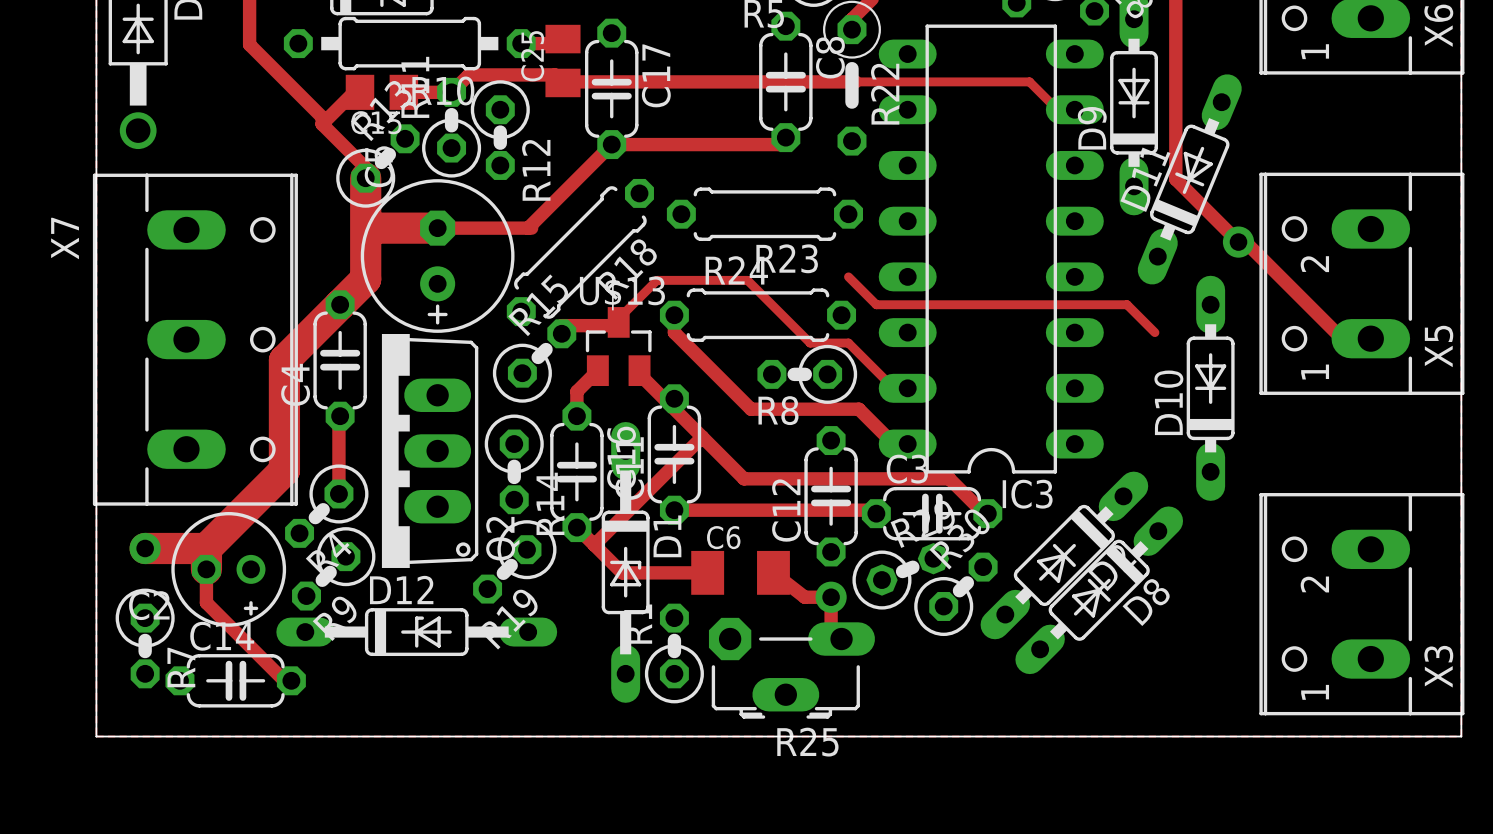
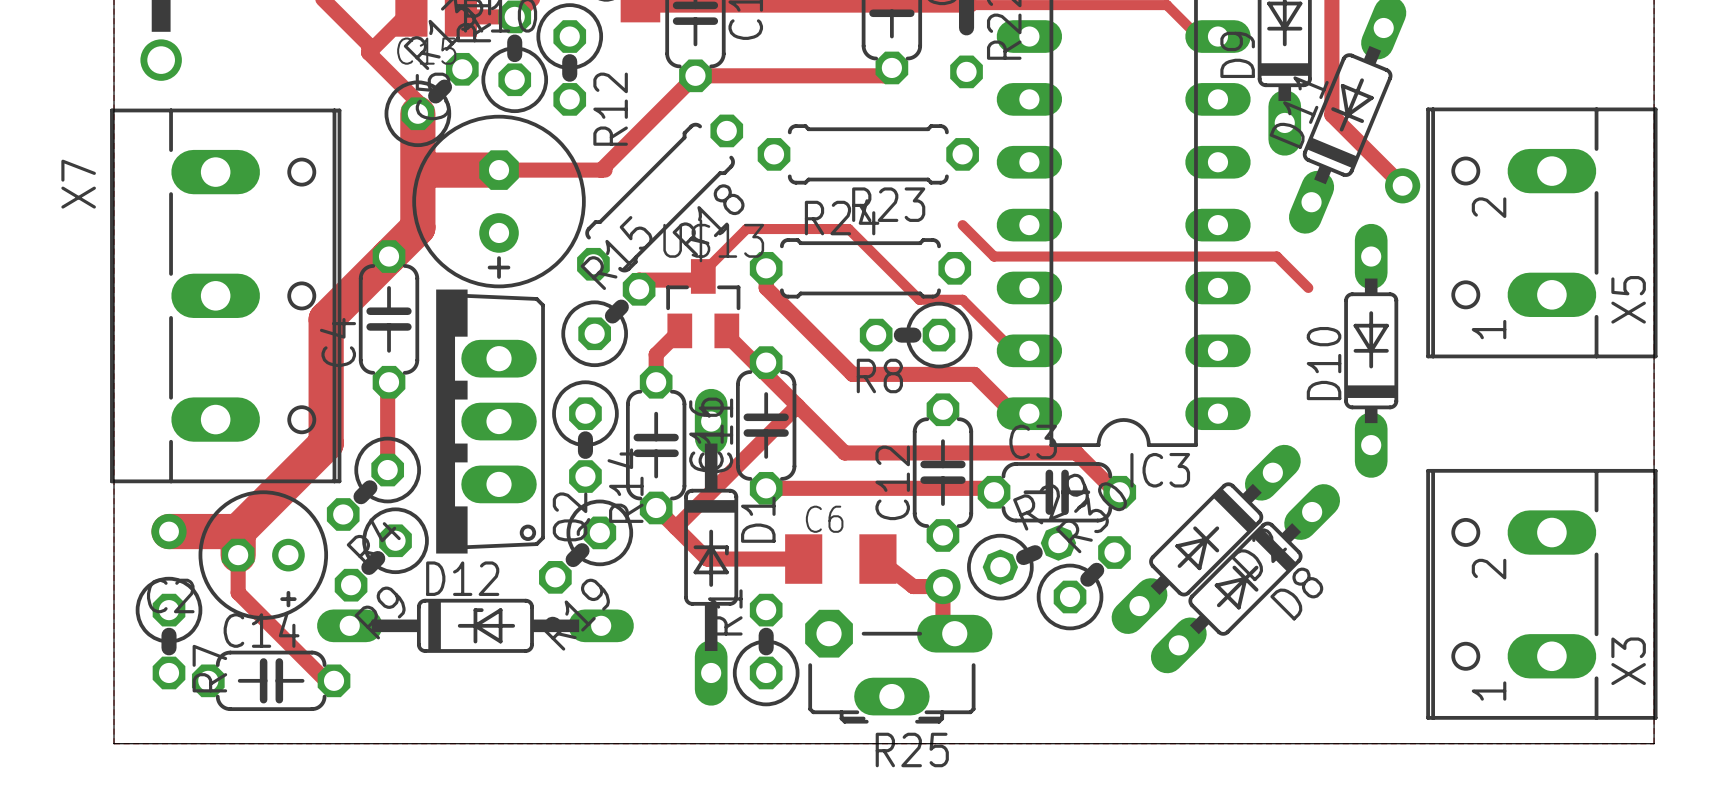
track: (1238, 242) (1245, 242) (1342, 339) (1370, 339) -> none

